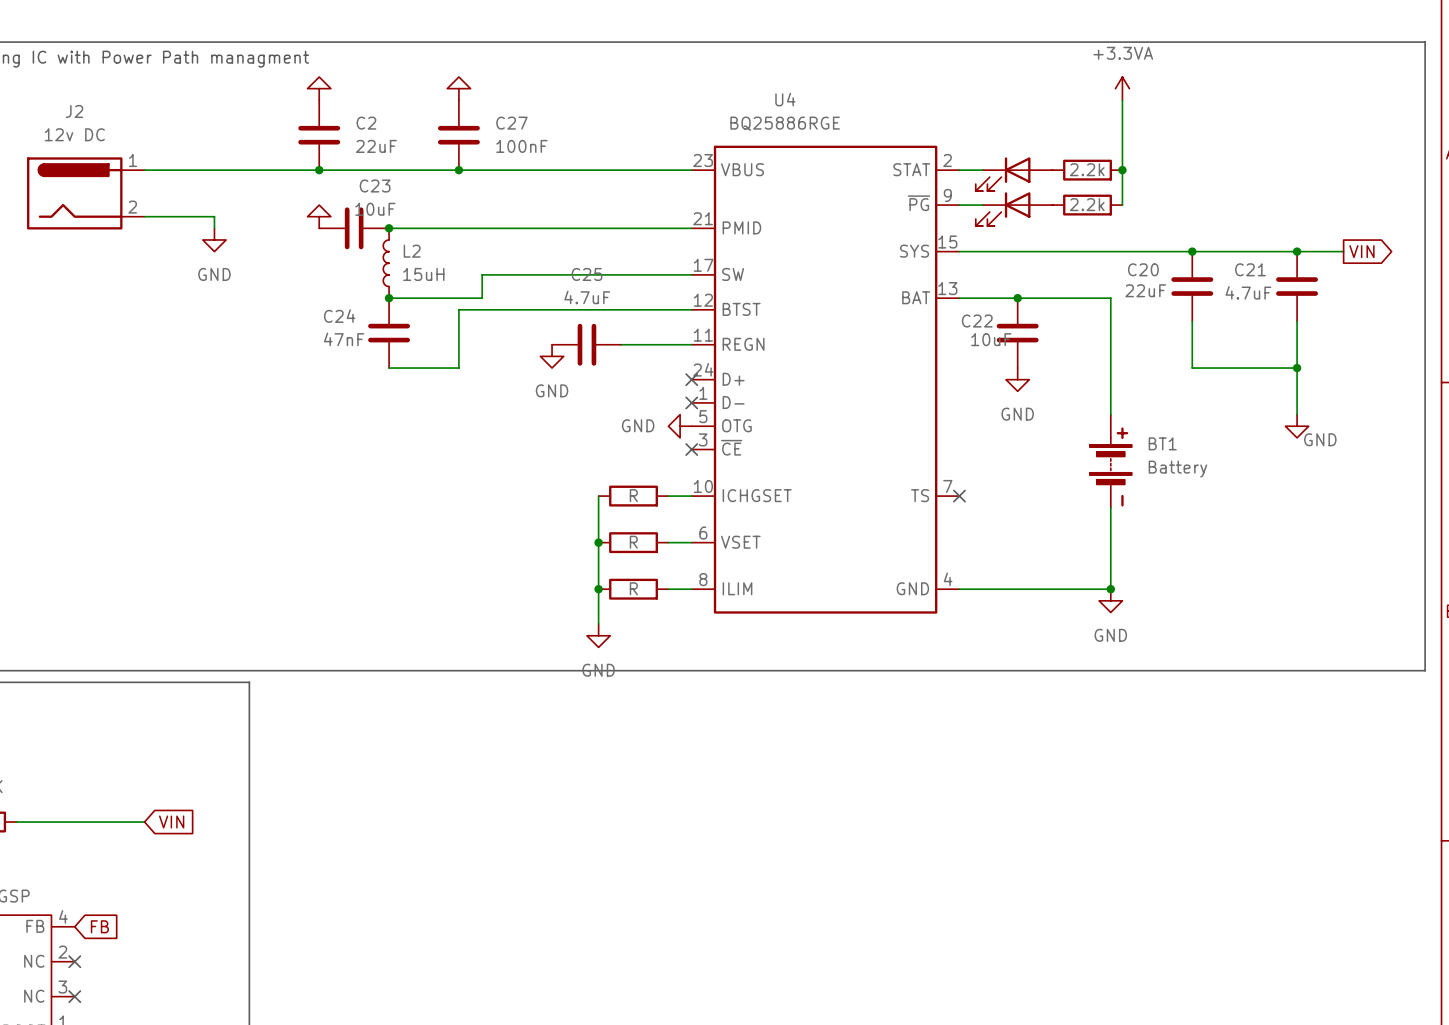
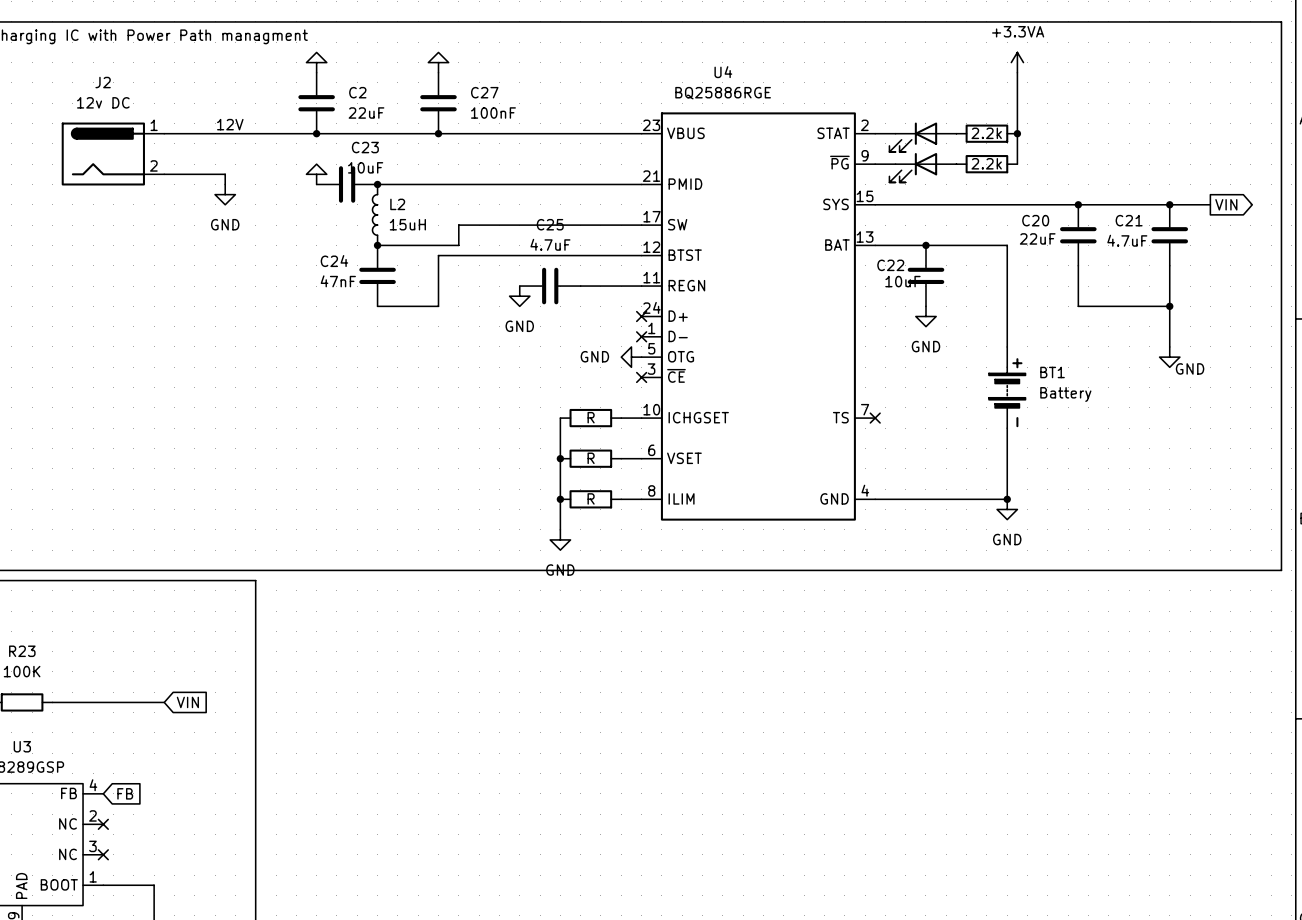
label: none -> 12V (230, 124)

